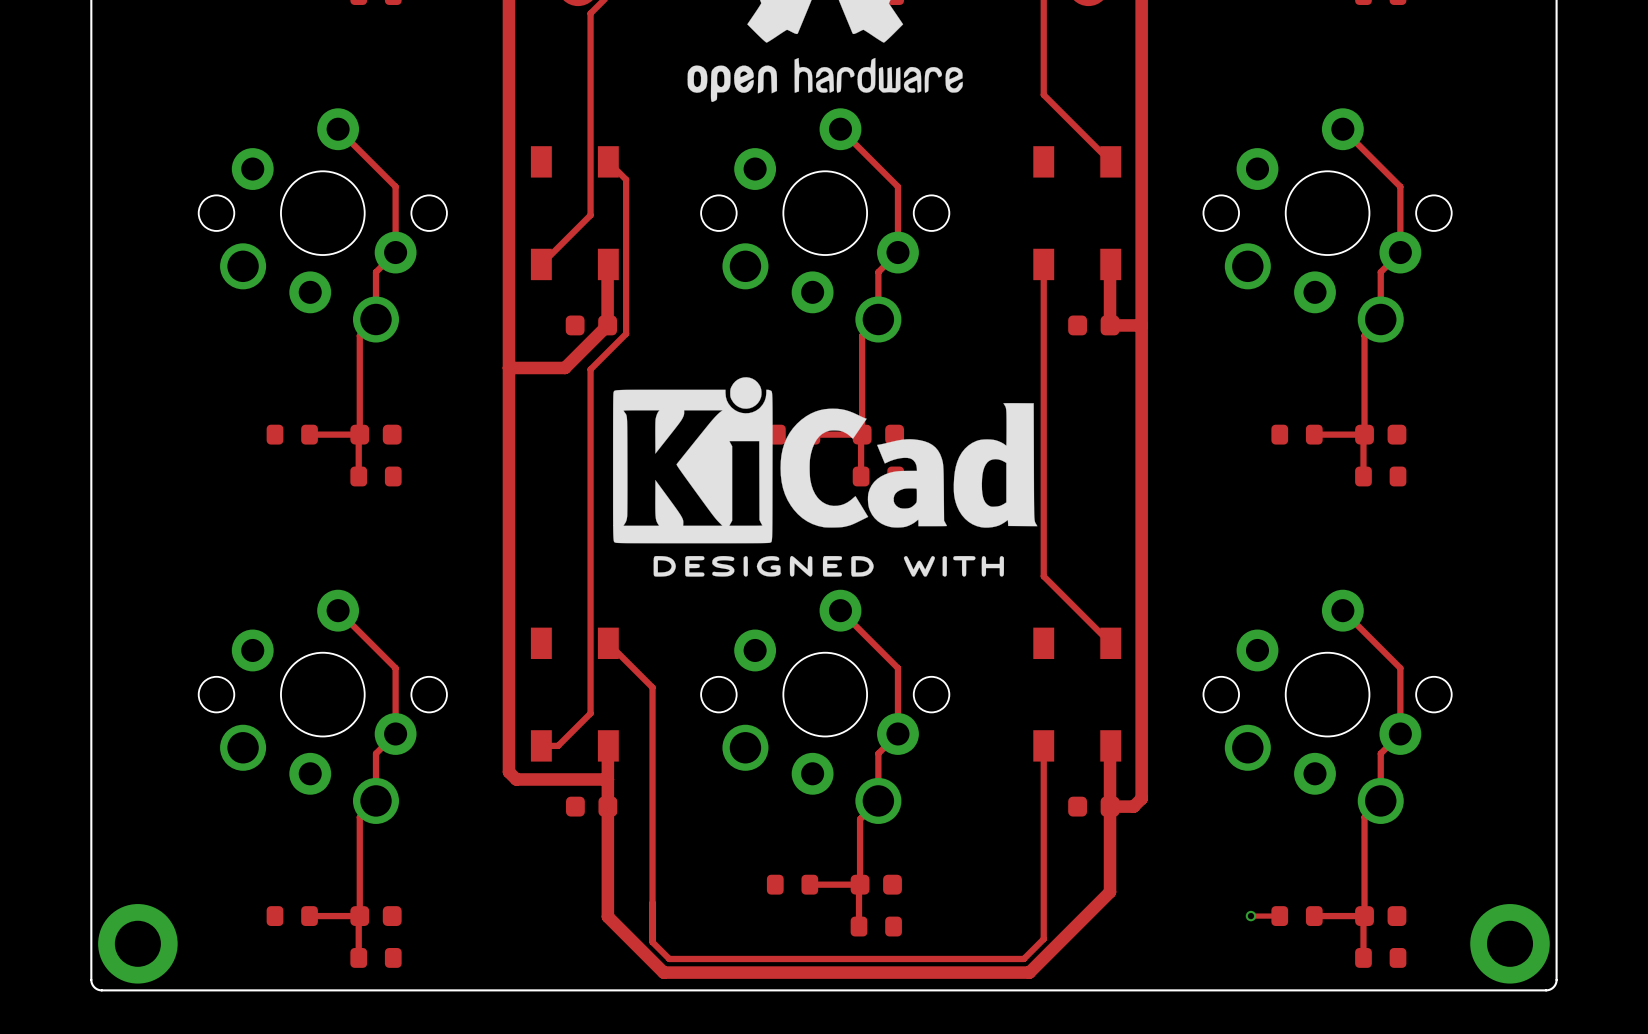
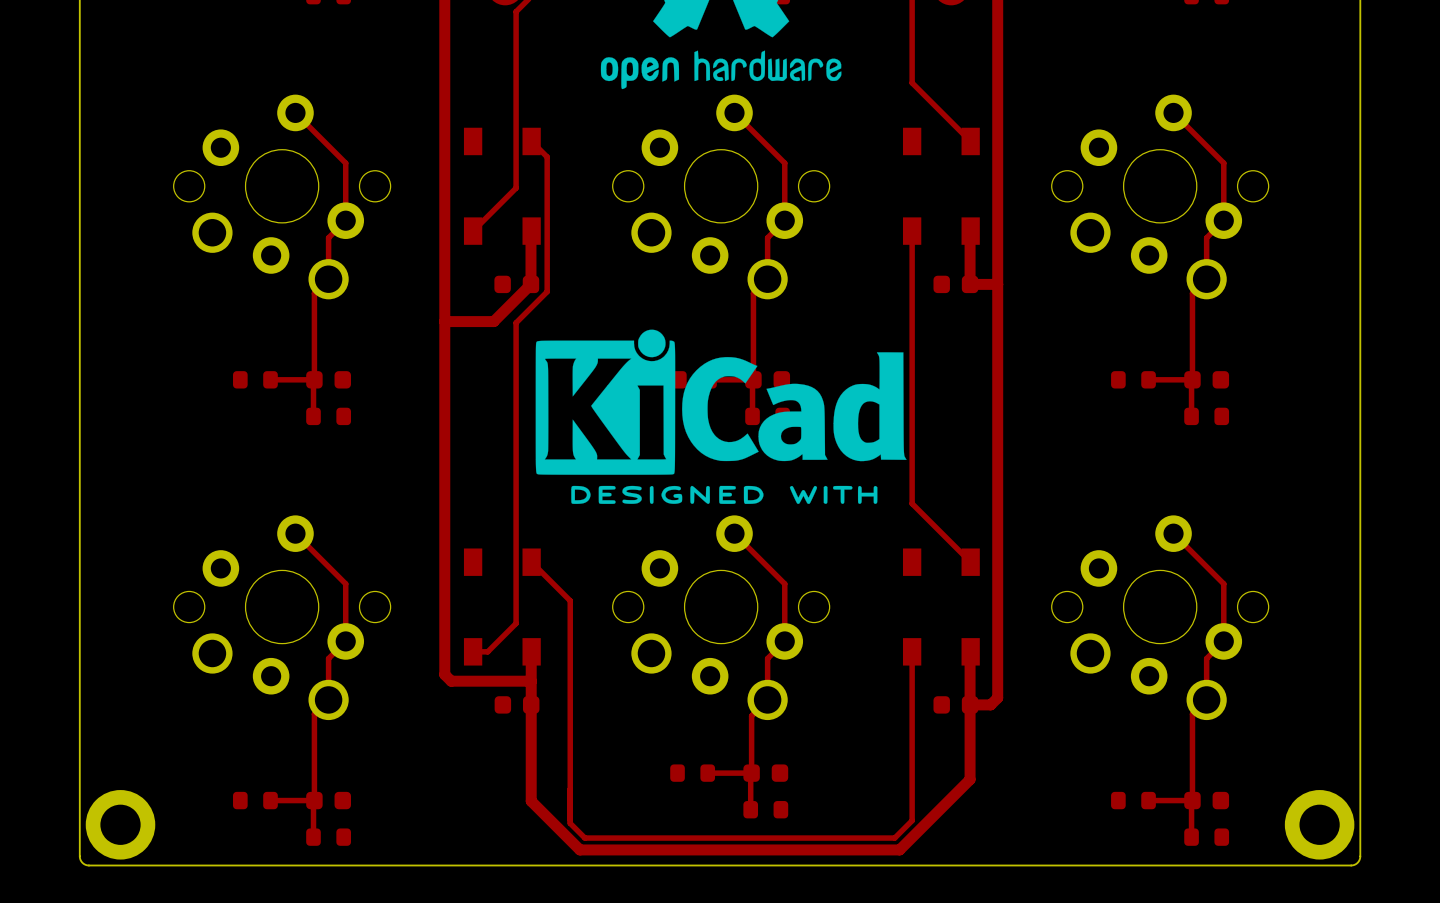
via: (1250, 916) -> none
top track: (1279, 916) (1250, 916) -> none

